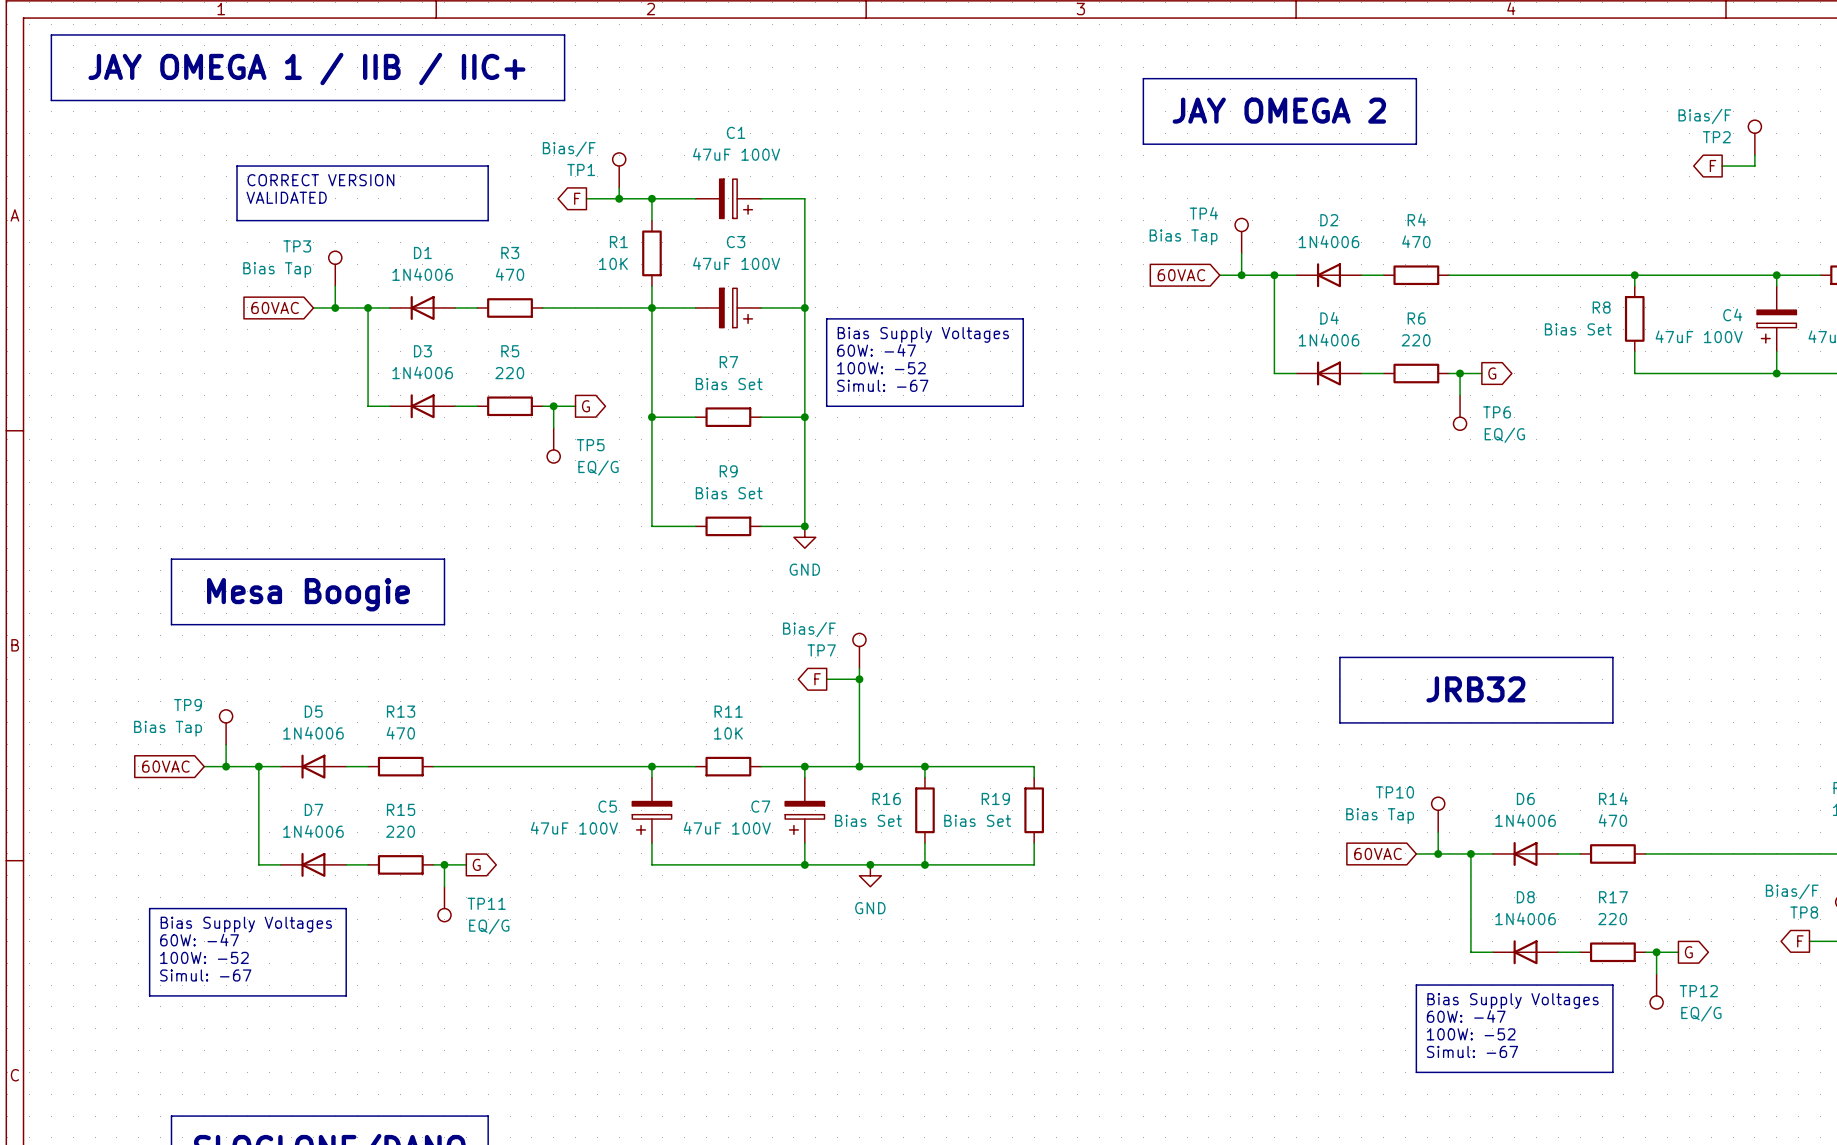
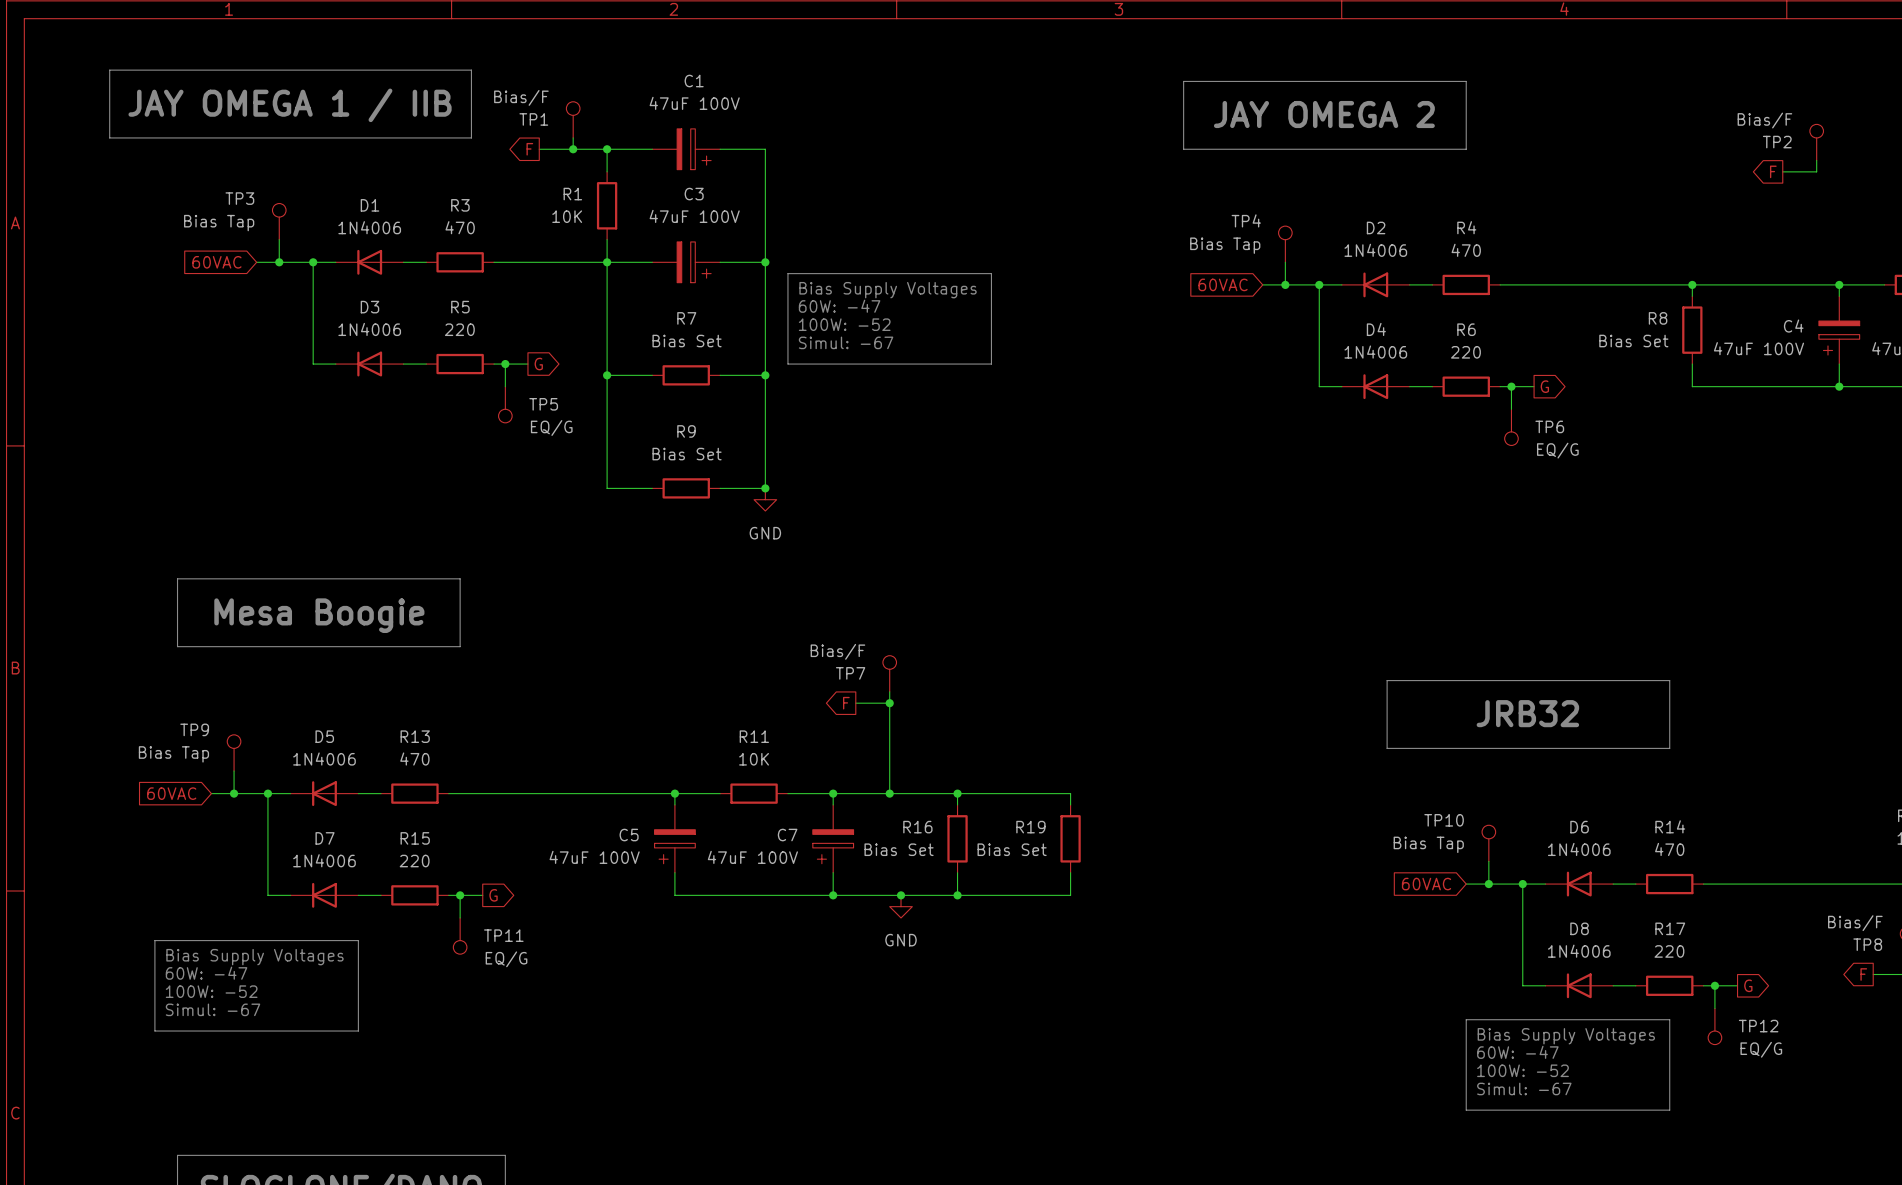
line: (51, 34) (564, 34) (564, 100) (51, 100) (51, 34) -> none
line: none -> (109, 70) (471, 70) (471, 137) (109, 137) (109, 70)
text: JAY OMEGA 1 / IIB / IIC+ (306, 69) -> JAY OMEGA 1 / IIB (290, 105)
junction: none -> (573, 149)
junction: none -> (607, 149)
line: (237, 166) (488, 166) (488, 220) (237, 220) (237, 166) -> none
TP1 position: (619, 170) -> (573, 119)
text: CORRECT VERSION (320, 180) -> none
wire: (619, 187) (619, 198) -> (573, 137) (573, 149)
text: VALIDATED (286, 197) -> none
global label position: F (577, 198) -> F (529, 149)
wire: (586, 198) (695, 198) -> (539, 149) (652, 149)
junction: (619, 198) -> none
wire: (651, 198) (651, 220) -> (607, 149) (607, 171)
junction: (651, 198) -> none
C1 position: (728, 198) -> (686, 149)
wire: (761, 198) (804, 198) (804, 526) (761, 526) -> (720, 149) (765, 149) (765, 488) (720, 488)
junction: none -> (279, 262)
junction: none -> (313, 262)
junction: none -> (607, 262)
R1 position: (651, 253) -> (607, 205)
junction: none -> (765, 262)
TP3 position: (335, 268) -> (279, 221)
wire: (335, 286) (335, 307) -> (279, 239) (279, 262)
wire: (651, 286) (651, 526) (695, 526) -> (607, 239) (607, 488) (652, 488)
global label position: 60VAC (275, 307) -> 60VAC (216, 262)
wire: (313, 307) (389, 307) -> (256, 262) (335, 262)
junction: (335, 307) -> none
wire: (368, 307) (368, 406) (389, 406) -> (313, 262) (313, 364) (335, 364)
junction: (368, 307) -> none
D1 position: (422, 307) -> (369, 262)
wire: (455, 307) (477, 307) -> (403, 262) (426, 262)
R3 position: (510, 307) -> (460, 262)
wire: (542, 307) (695, 307) -> (494, 262) (652, 262)
junction: (651, 307) -> none
C3 position: (728, 307) -> (686, 262)
wire: (761, 307) (804, 307) -> (720, 262) (765, 262)
junction: (804, 307) -> none
line: (826, 318) (1023, 318) (1023, 406) (826, 406) (826, 318) -> (787, 273) (991, 273) (991, 364) (787, 364) (787, 273)
text position: Bias Supply Voltages (923, 334) -> Bias Supply Voltages (888, 290)
text position: 60W: -47 (876, 350) -> 60W: -47 (839, 306)
junction: none -> (505, 364)
junction: none -> (607, 375)
junction: none -> (765, 375)
text position: 100W: -52 (881, 368) -> 100W: -52 (844, 324)
text position: Simul: -67 (882, 385) -> Simul: -67 (846, 342)
D3 position: (422, 406) -> (369, 364)
wire: (455, 406) (477, 406) -> (403, 364) (426, 364)
R5 position: (510, 406) -> (460, 364)
wire: (542, 406) (575, 406) -> (494, 364) (527, 364)
wire: (553, 406) (553, 428) -> (505, 364) (505, 386)
junction: (553, 406) -> none
global label position: G (585, 406) -> G (538, 364)
wire: (651, 417) (695, 417) -> (607, 375) (652, 375)
junction: (651, 417) -> none
R7 position: (728, 417) -> (686, 375)
wire: (761, 417) (804, 417) -> (720, 375) (765, 375)
junction: (804, 417) -> none
TP5 position: (553, 445) -> (505, 404)
junction: none -> (765, 488)
R9 position: (728, 526) -> (686, 488)
junction: (804, 526) -> none
power symbol position: GND (804, 537) -> GND (765, 499)

